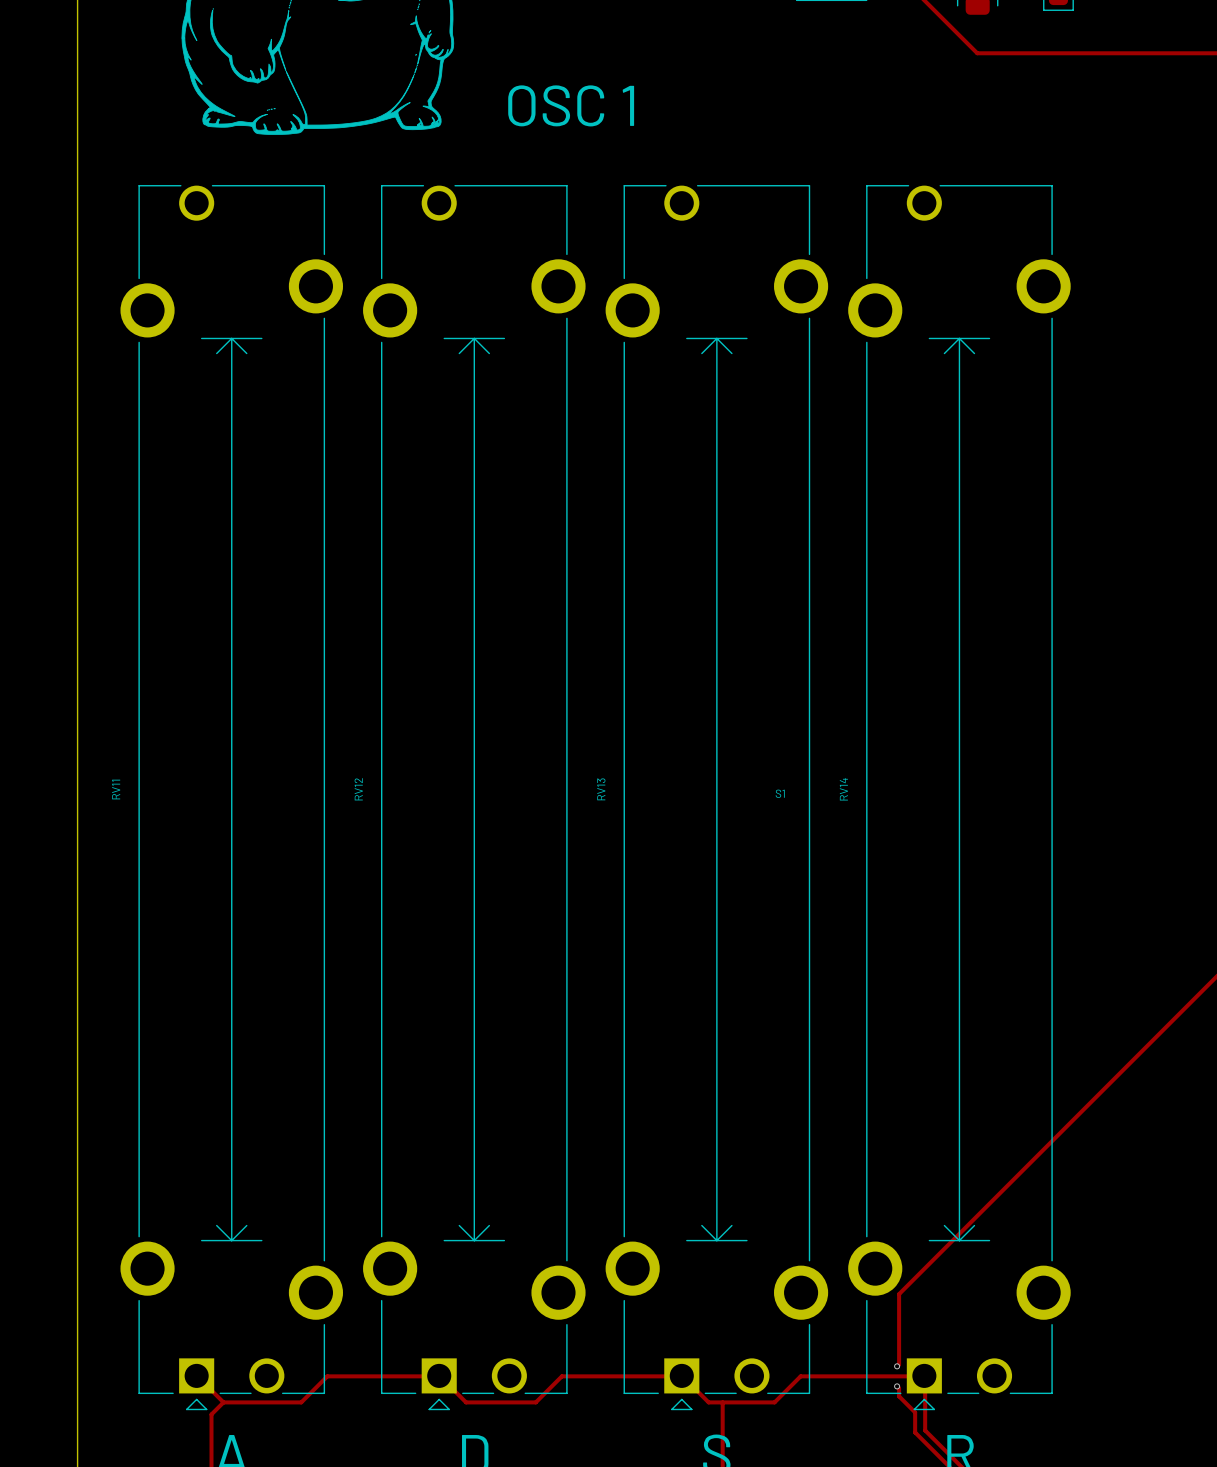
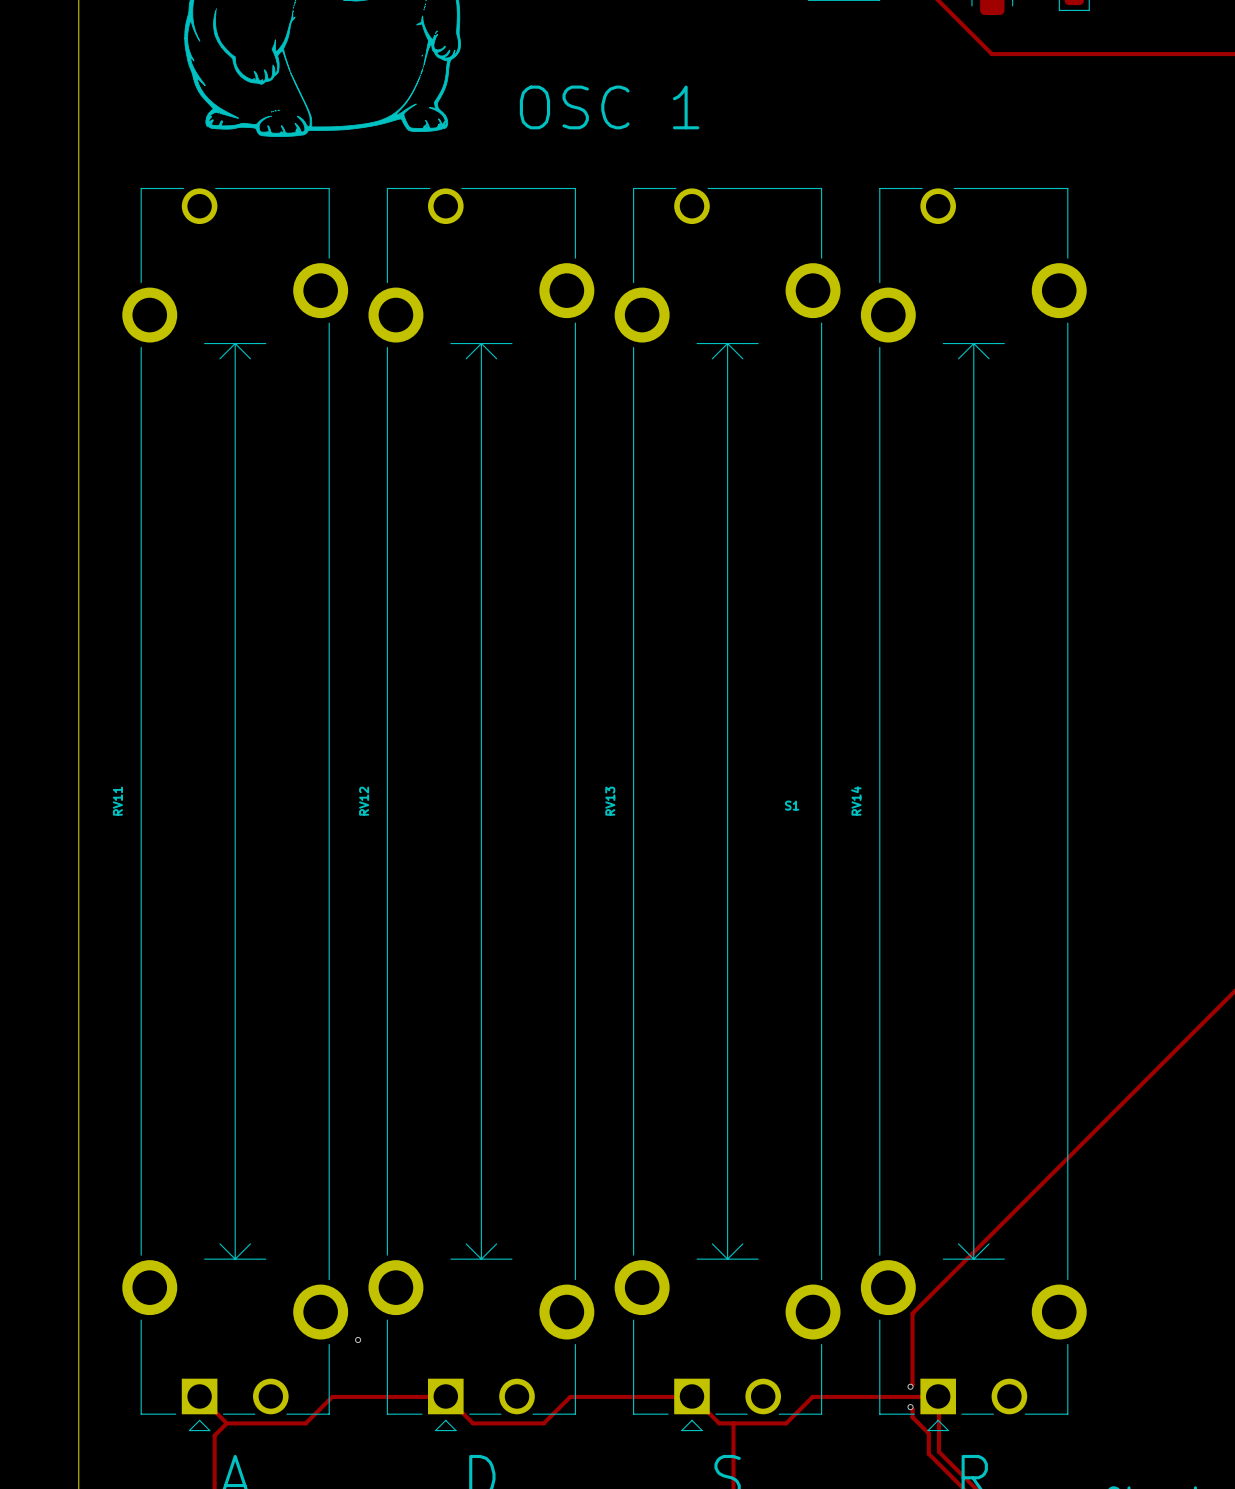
via: none -> (358, 1339)

